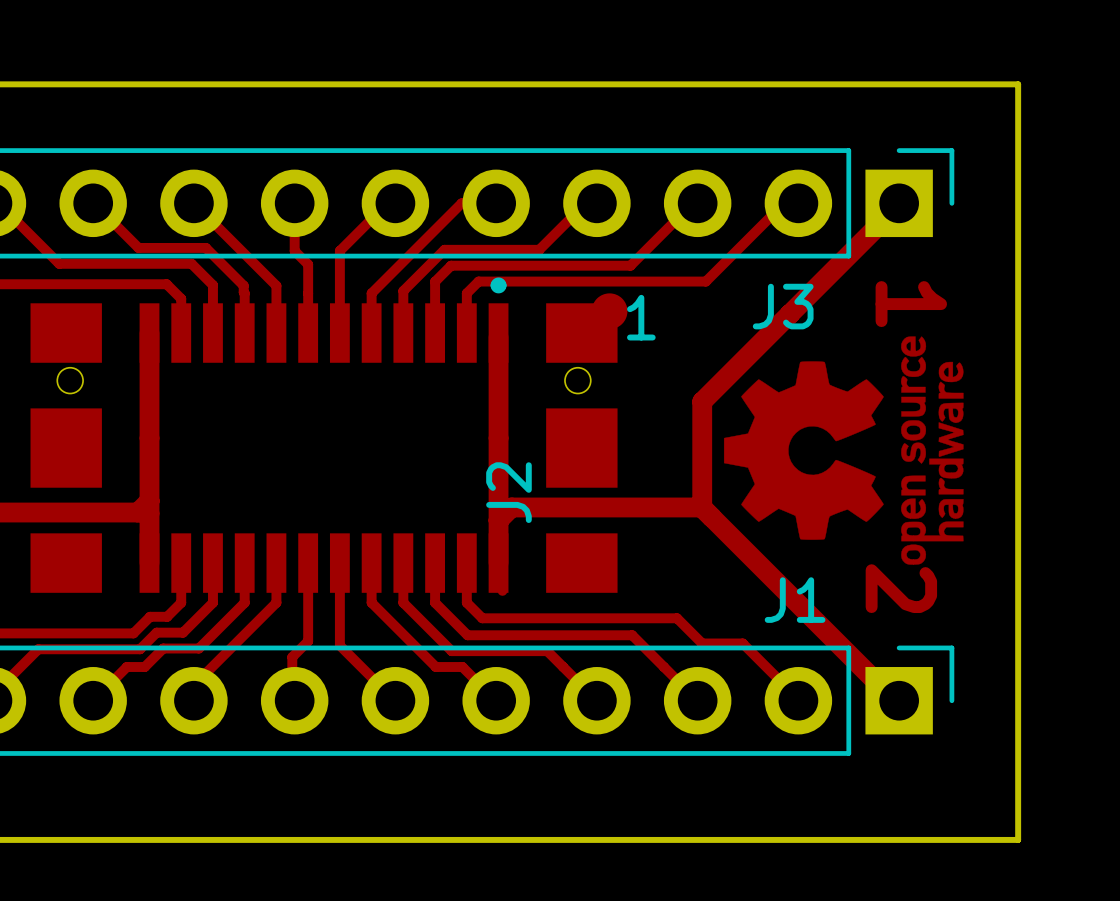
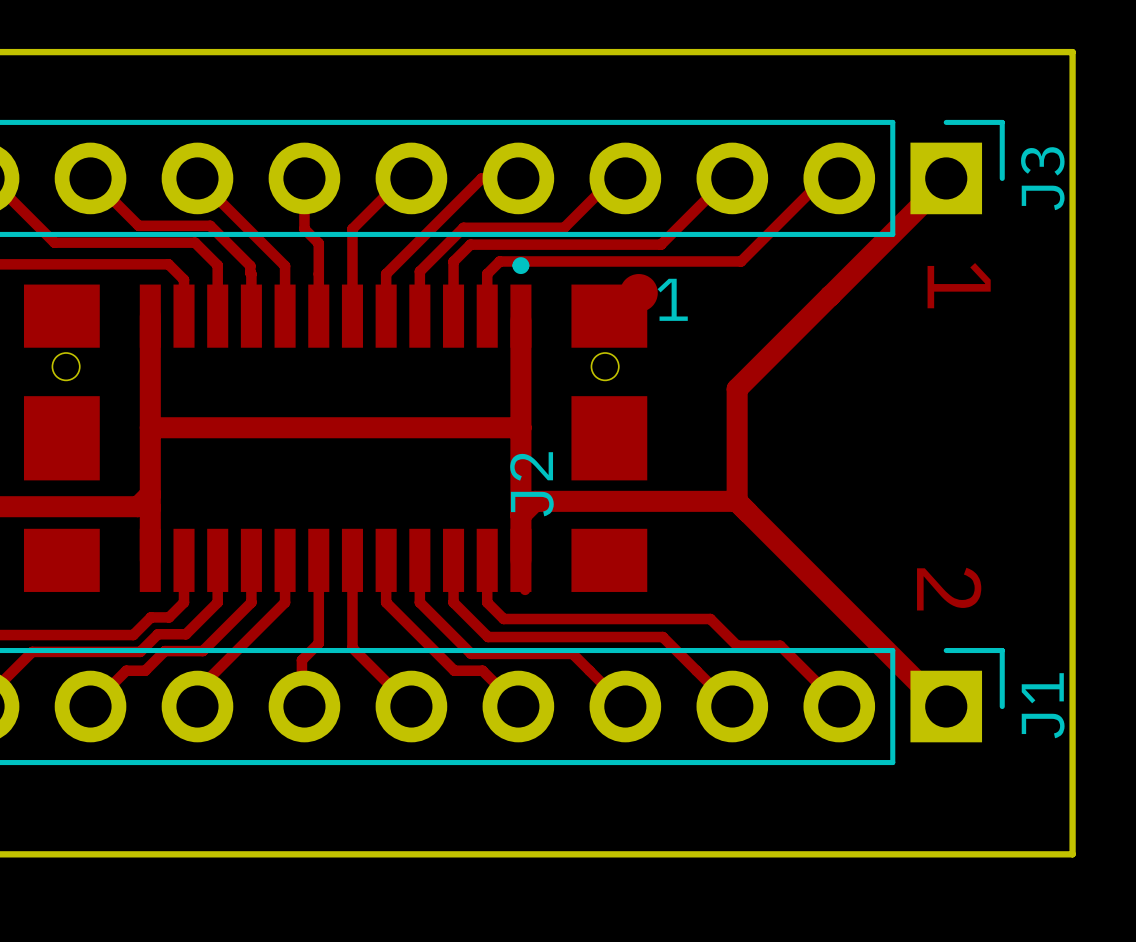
J3 name rotation: 0° (783, 306) -> 90° counterclockwise (1042, 178)
J3 name position: J3 (783, 306) -> J3 (1042, 178)
drawing: [723, 336, 964, 565] -> none
track: none -> (150, 427) (520, 427)
J1 name rotation: 0° (795, 600) -> 90° counterclockwise (1043, 705)
J1 name position: J1 (795, 600) -> J1 (1043, 705)

